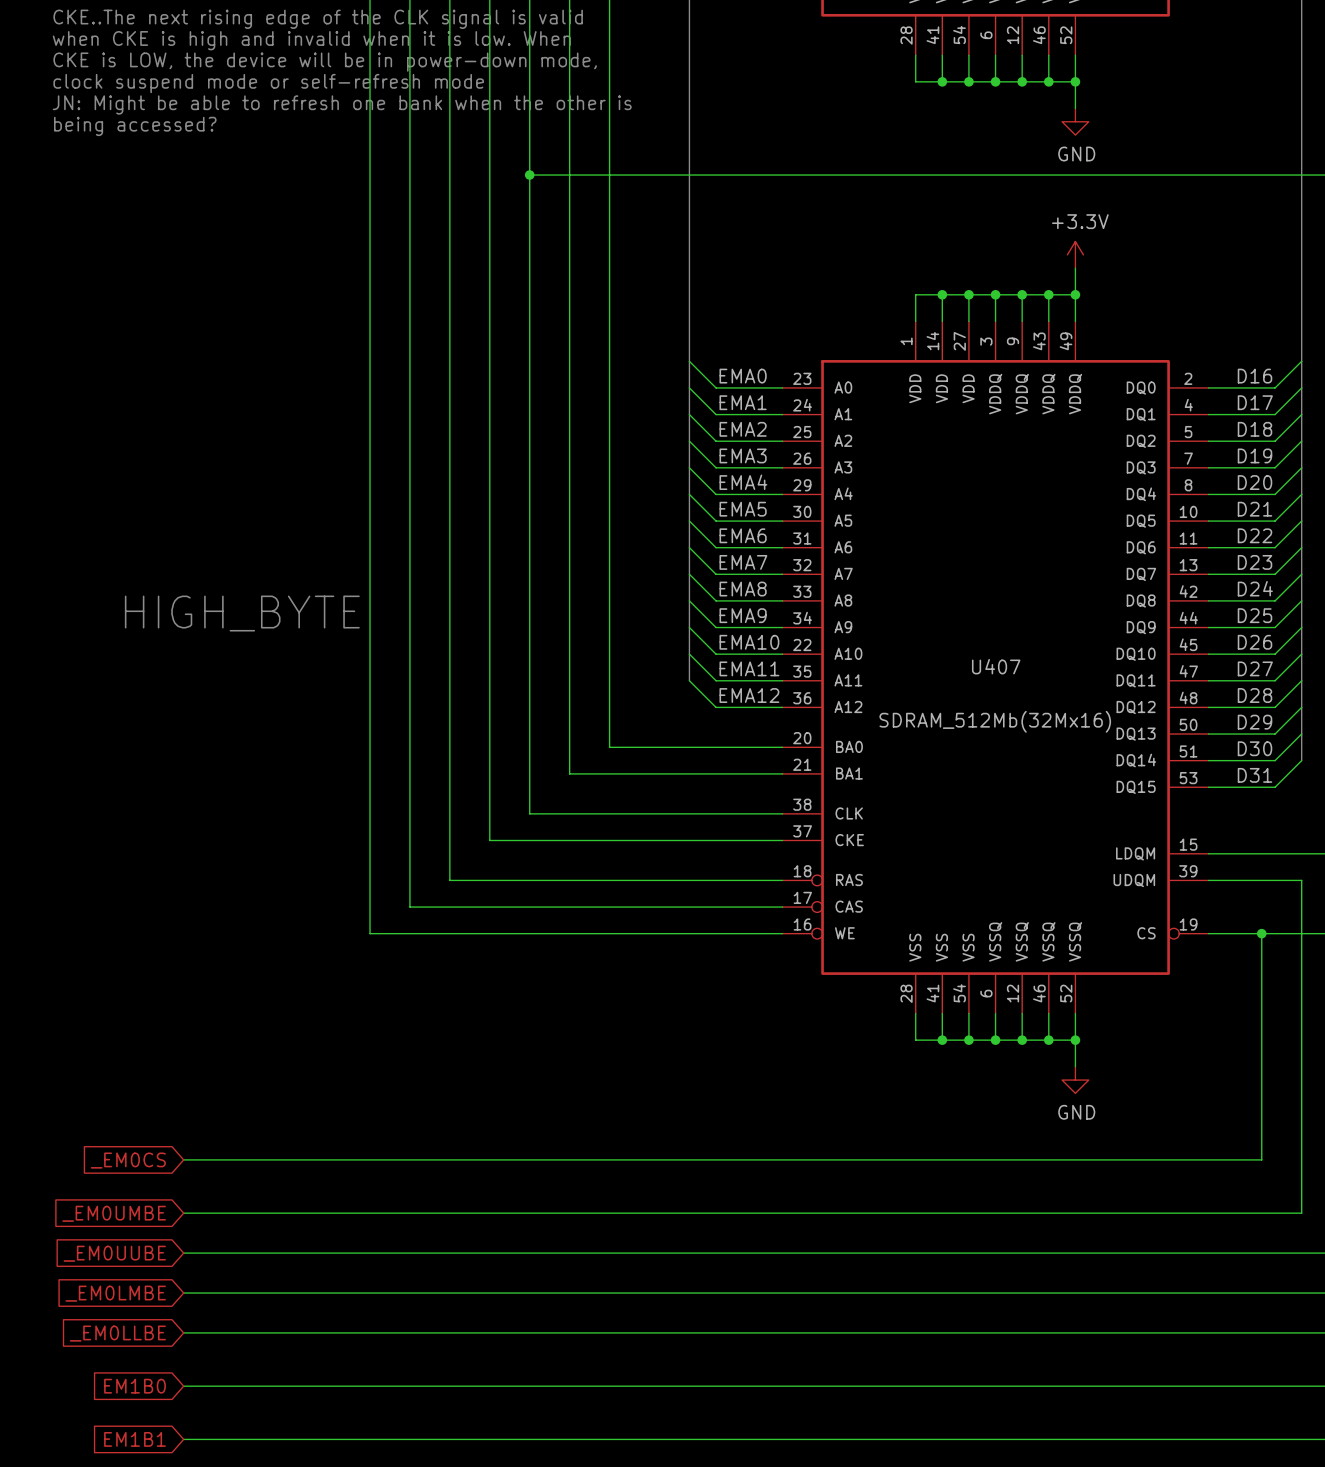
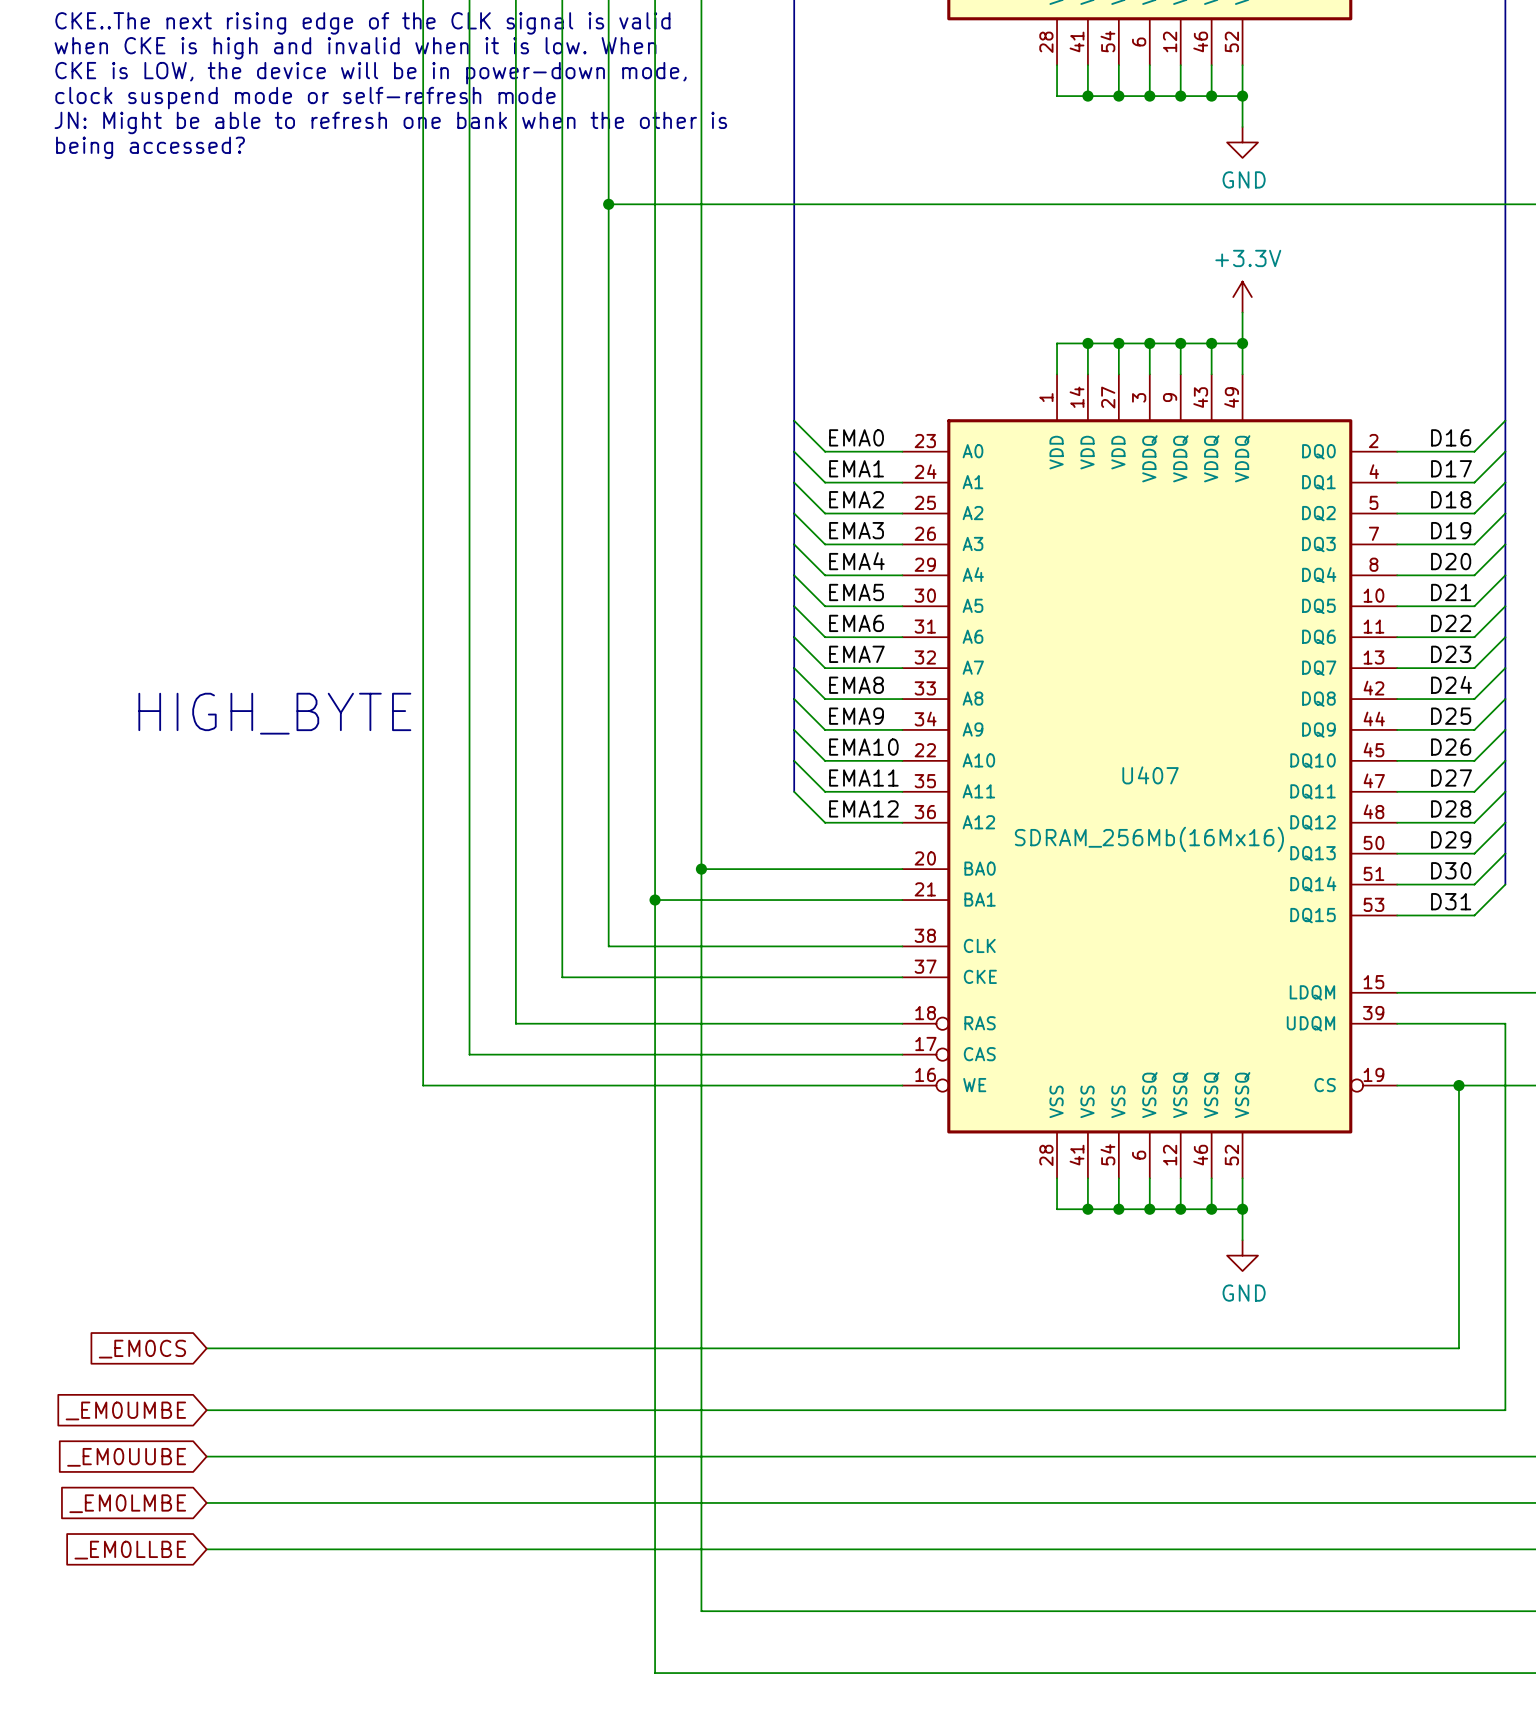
U407 value: SDRAM_512Mb(32Mx16) (995, 721) -> SDRAM_256Mb(16Mx16) (1149, 839)
junction: none -> (701, 869)
junction: none -> (655, 900)
global label: EM1B0 (135, 1386) -> none
wire: (183, 1386) (609, 1386) -> (701, 869) (701, 1611)
global label: EM1B1 (135, 1439) -> none
wire: (183, 1439) (569, 1439) -> (655, 900) (655, 1673)

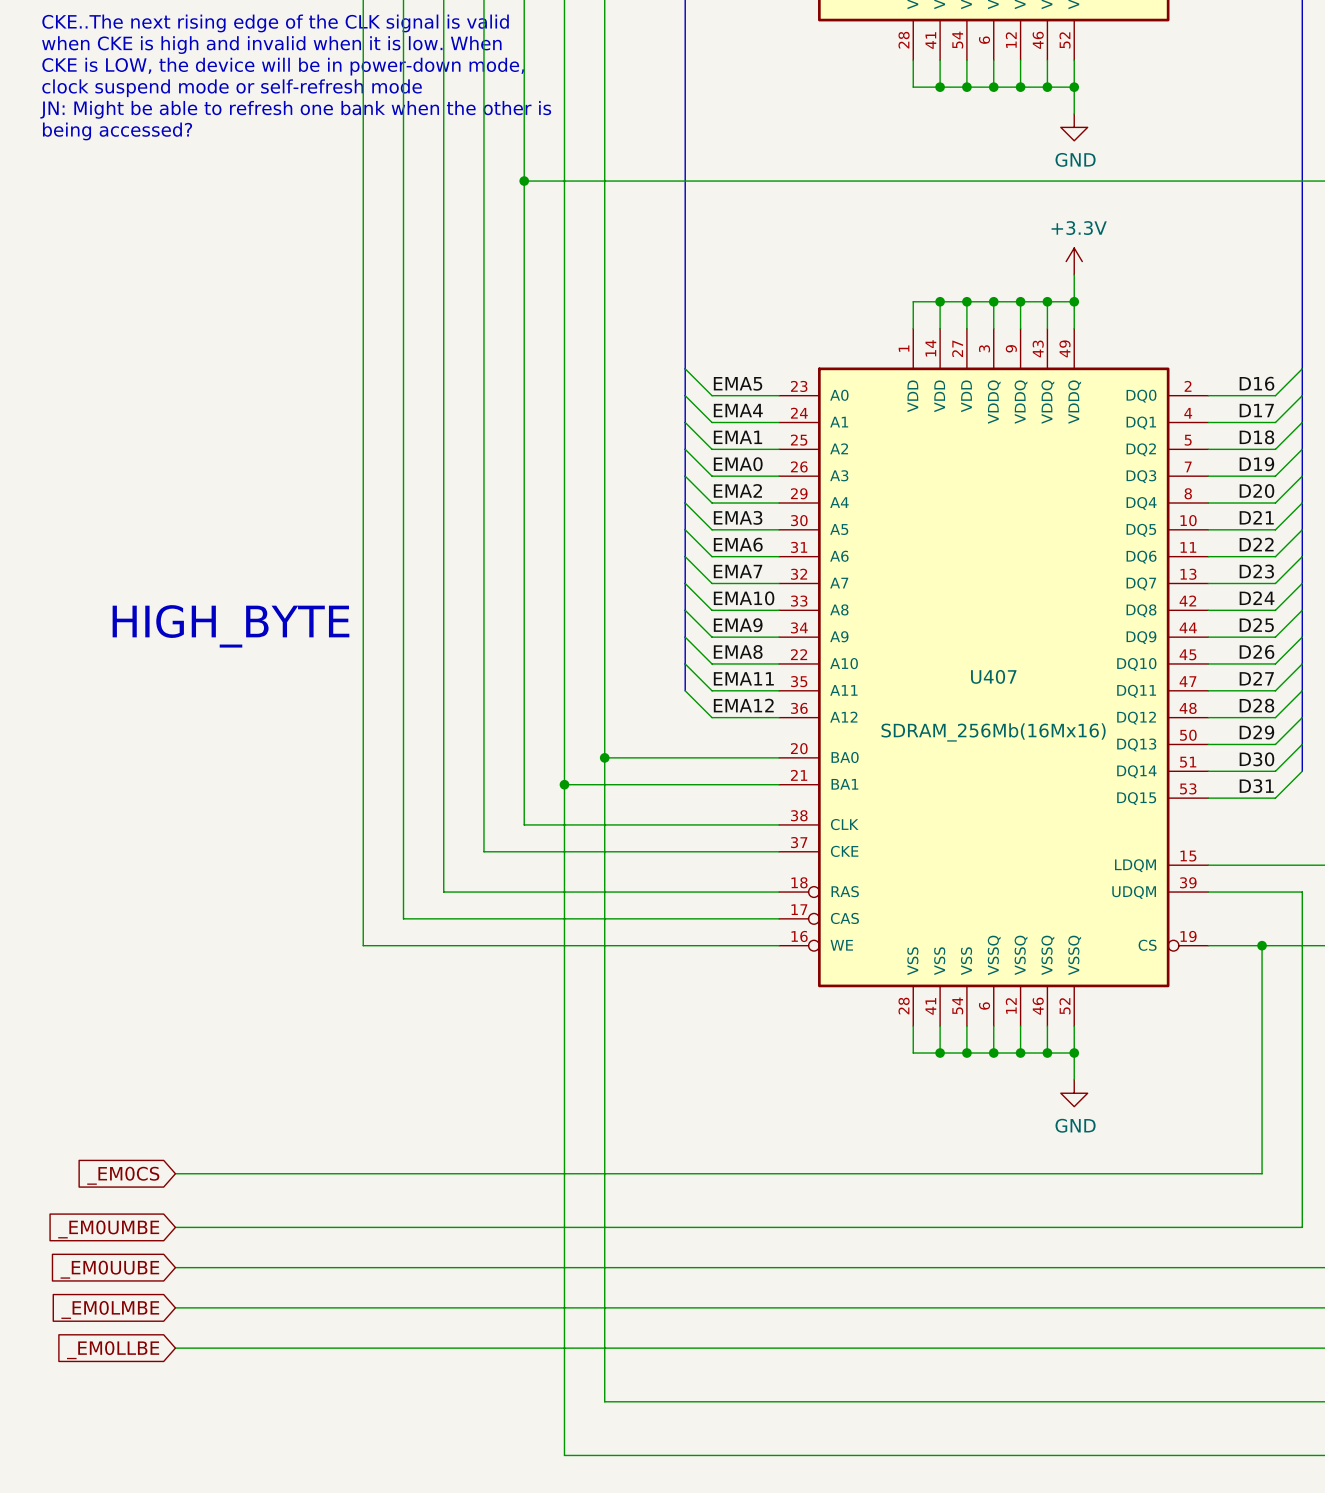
label: EMA0 (856, 437) -> EMA5 (738, 383)
label: EMA1 (856, 468) -> EMA4 (738, 410)
label: EMA2 (856, 499) -> EMA1 (737, 437)
label: EMA3 (856, 530) -> EMA0 (738, 464)
label: EMA4 (856, 561) -> EMA2 (737, 490)
label: EMA5 (856, 592) -> EMA3 (738, 517)
label: EMA8 (856, 685) -> EMA10 (744, 598)
label: EMA10 (863, 747) -> EMA8 (738, 652)

